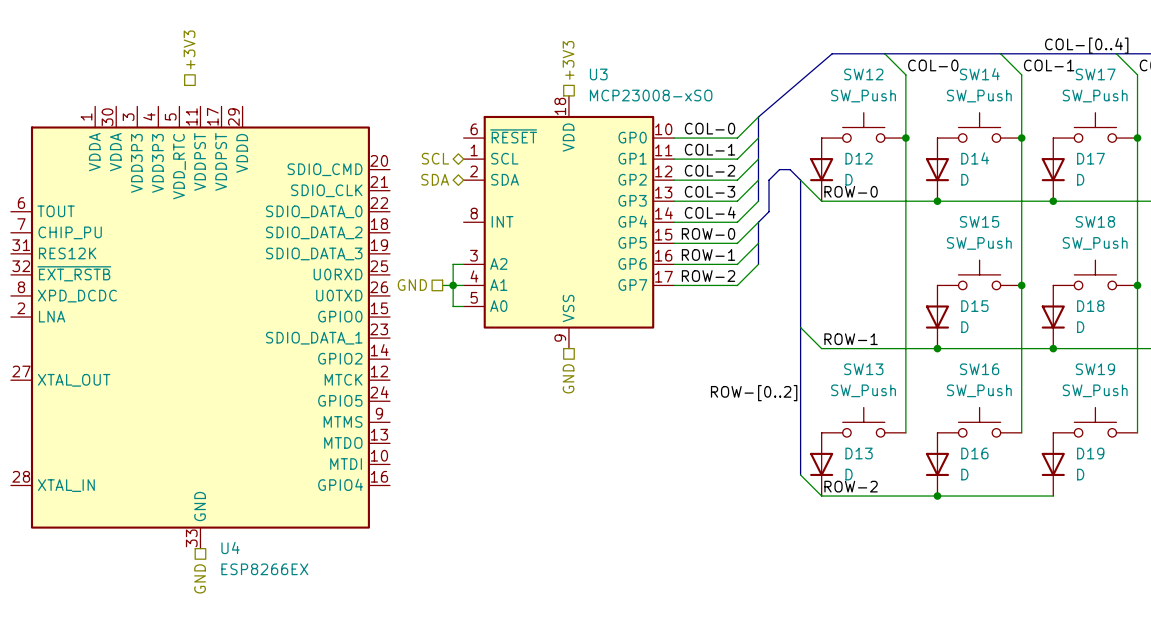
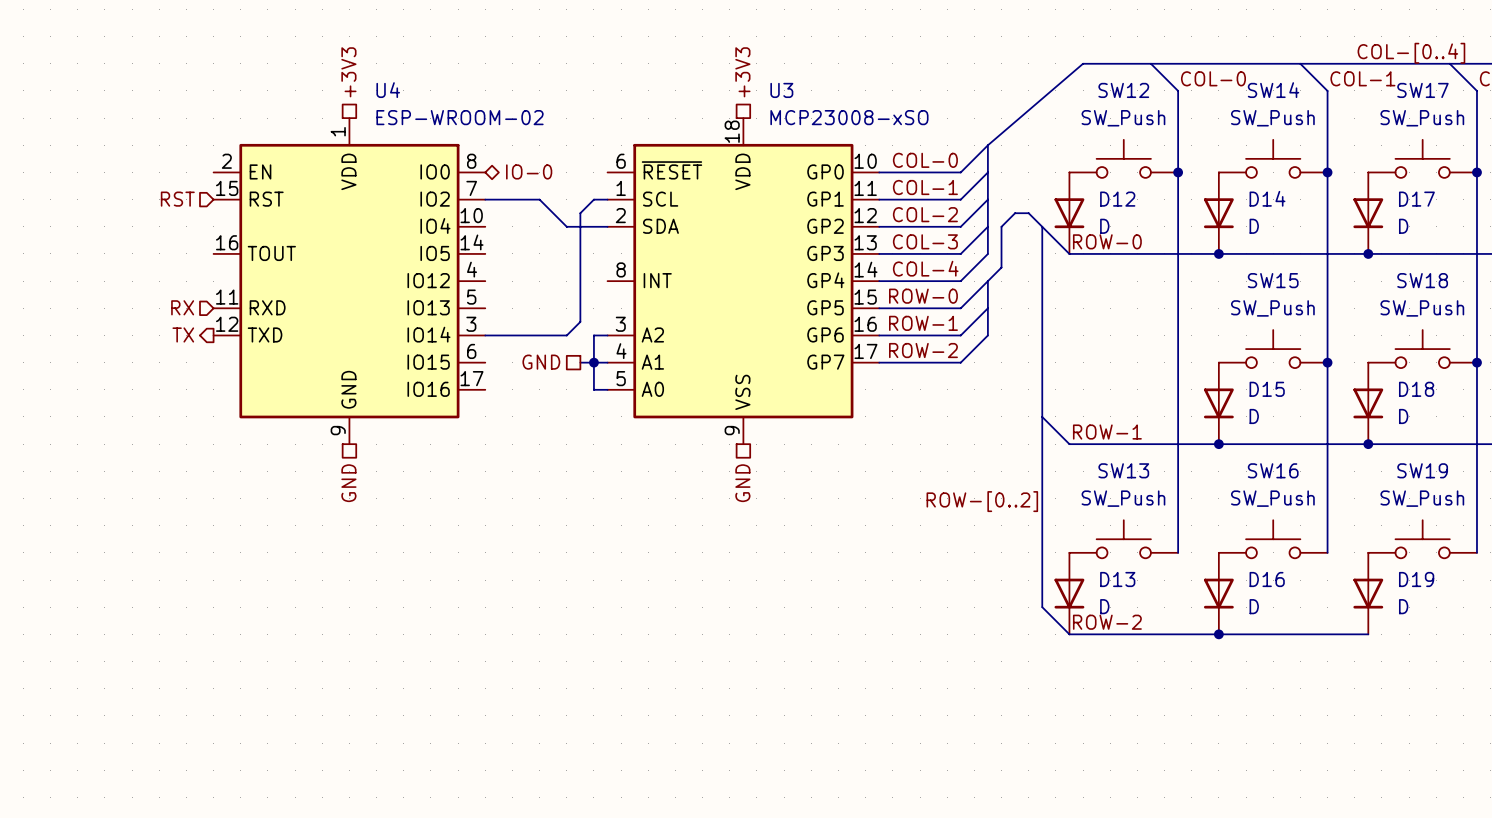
hierarchical label position: +3V3 (189, 49) -> +3V3 (348, 72)
U4 symbol: [10, 106, 390, 549] -> [213, 118, 486, 445]
hierarchical label: none -> IO-0 (529, 171)
hierarchical label: none -> RST (177, 199)
hierarchical label: SCL (435, 158) -> none
wire: none -> (485, 199) (539, 199) (566, 226) (607, 226)
wire: none -> (607, 199) (593, 199) (580, 213) (580, 321) (566, 335) (485, 335)
hierarchical label: SDA (435, 179) -> none
hierarchical label: none -> RX (182, 307)
hierarchical label: none -> TX (183, 334)
hierarchical label: none -> GND (348, 483)
U4 name position: U4 (230, 548) -> U4 (388, 90)
U4 value: ESP8266EX (264, 569) -> ESP-WROOM-02 (460, 117)
hierarchical label: GND (200, 578) -> none

